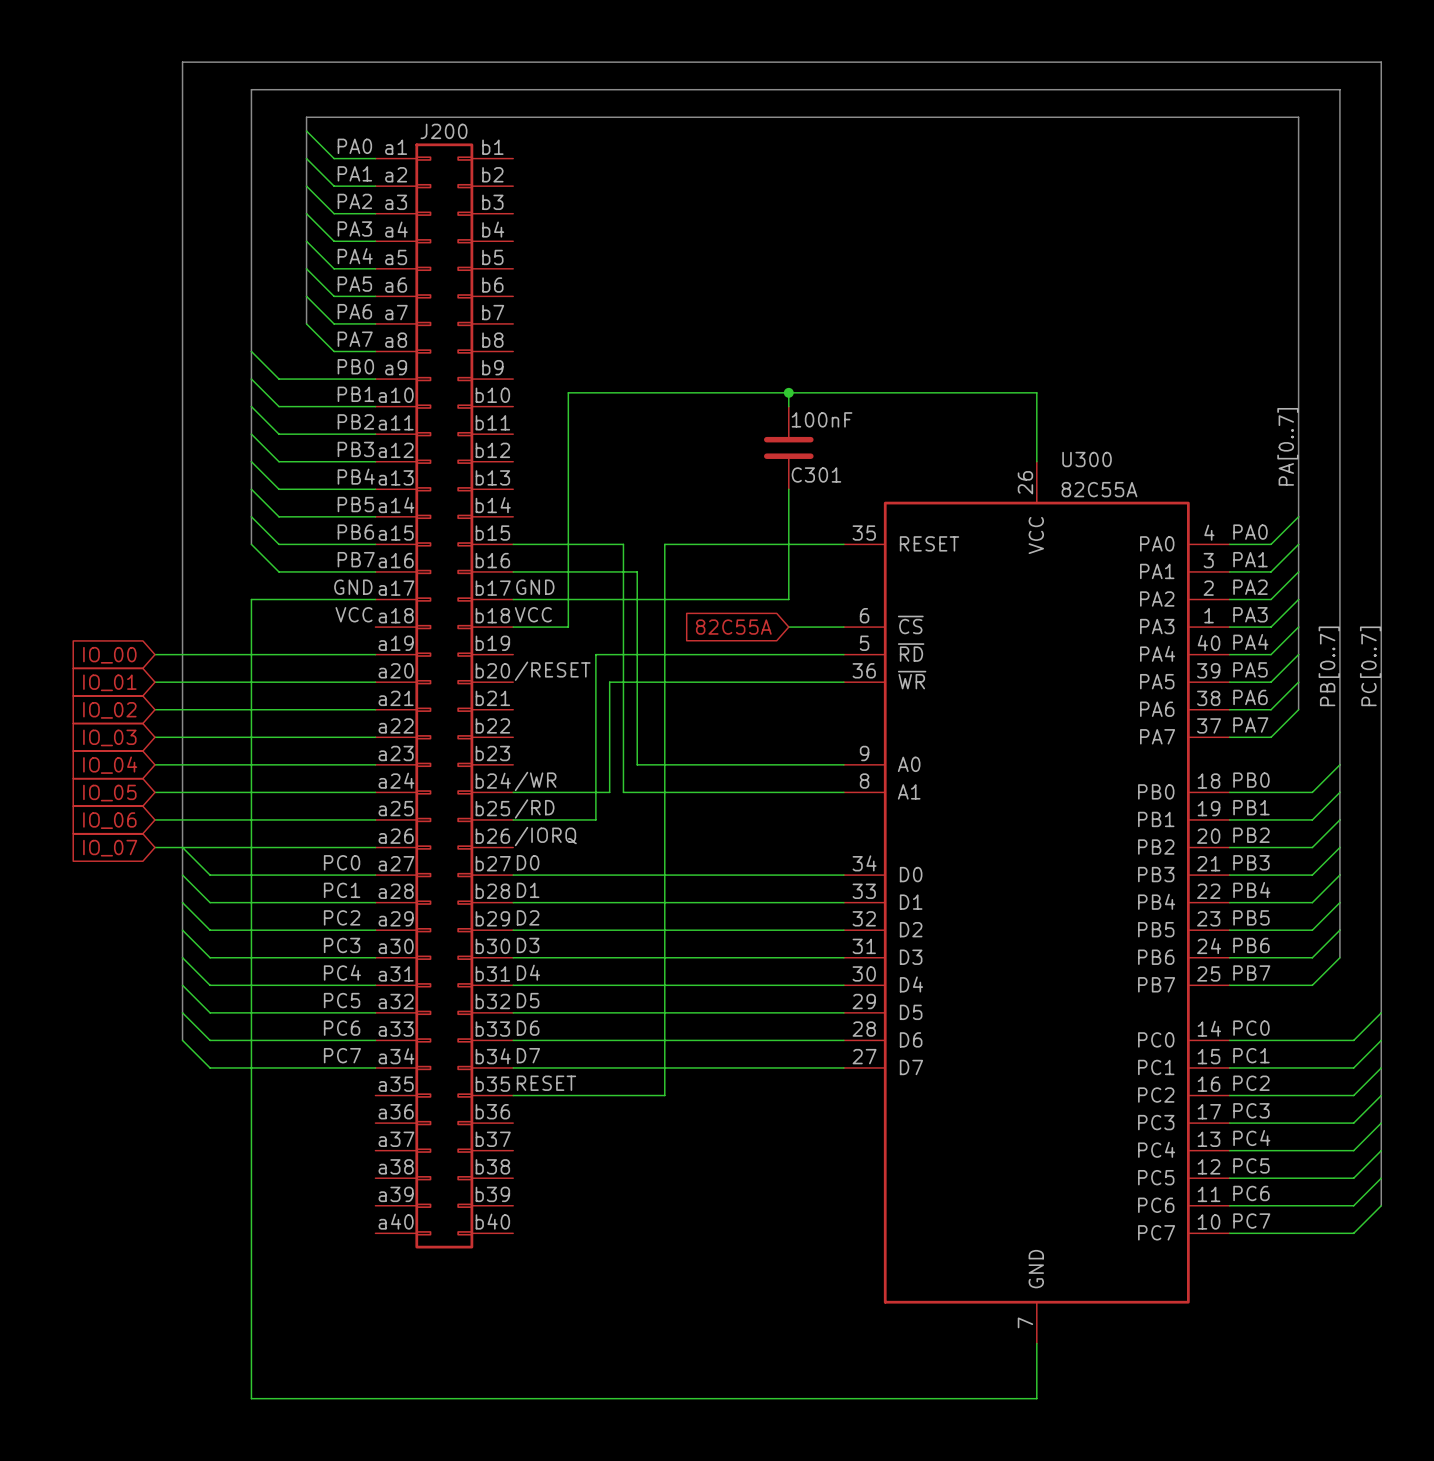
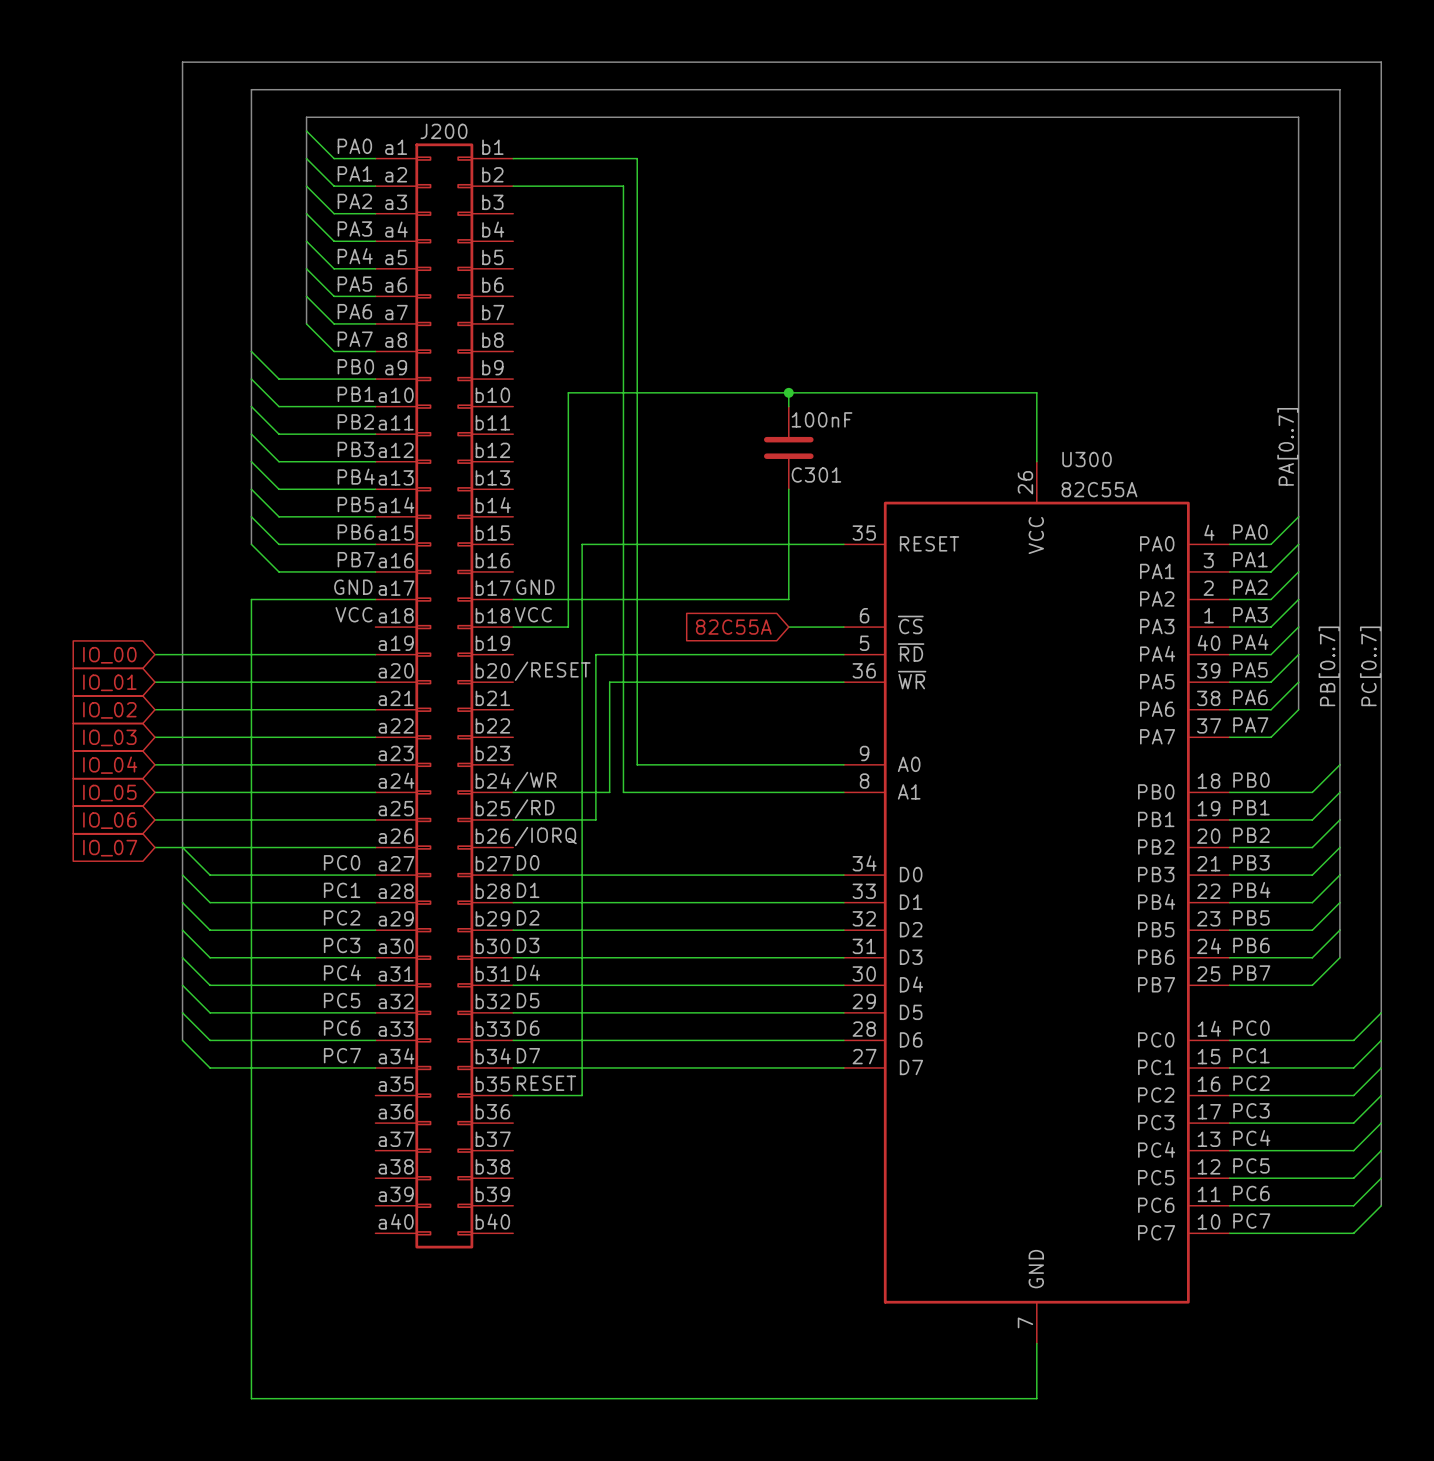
wire: none -> (513, 186) (623, 186) (623, 544) (664, 544)
wire: (513, 544) (582, 544) -> none
wire: (664, 544) (664, 1095) (582, 1095) -> (582, 544) (582, 1095)
wire: (513, 571) (637, 571) -> (513, 158) (637, 158) (637, 571)

